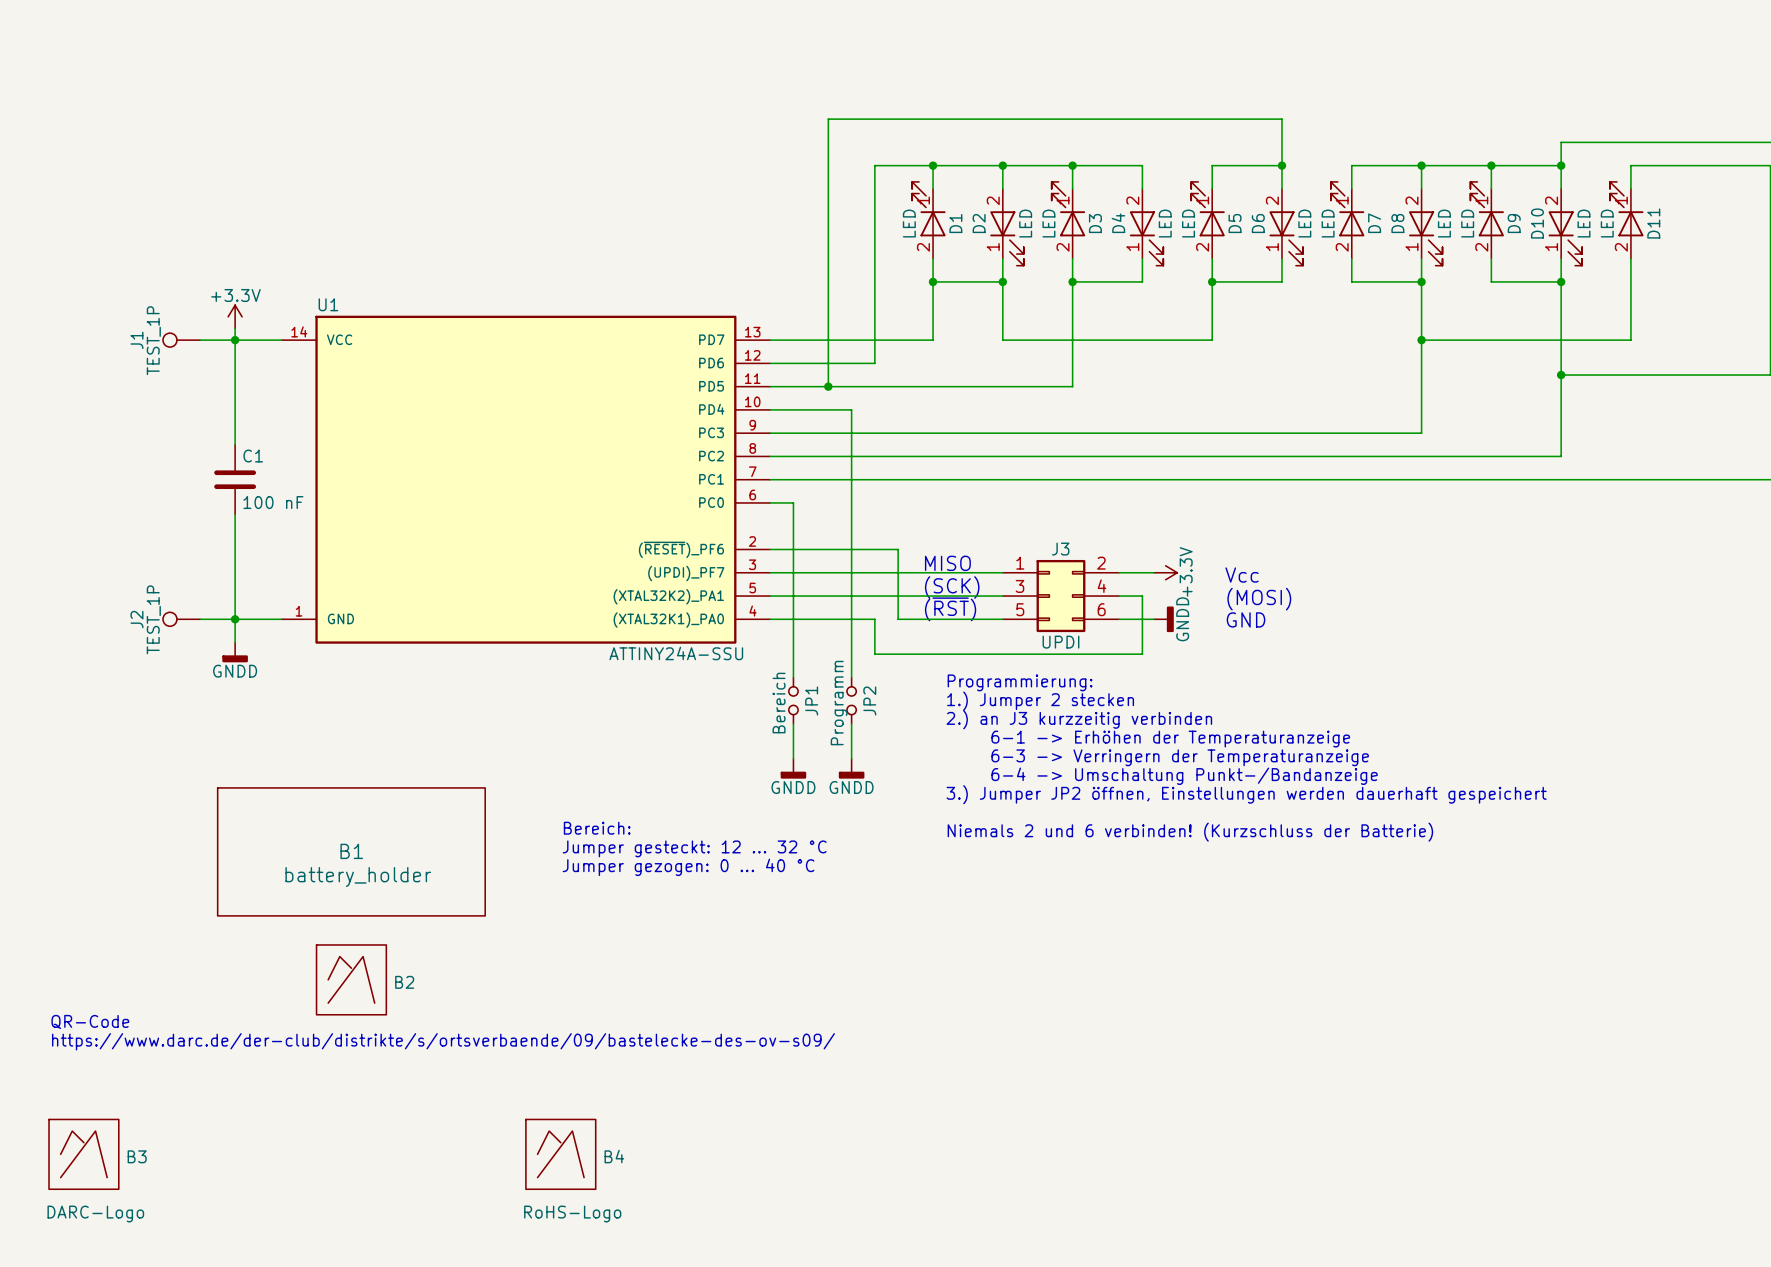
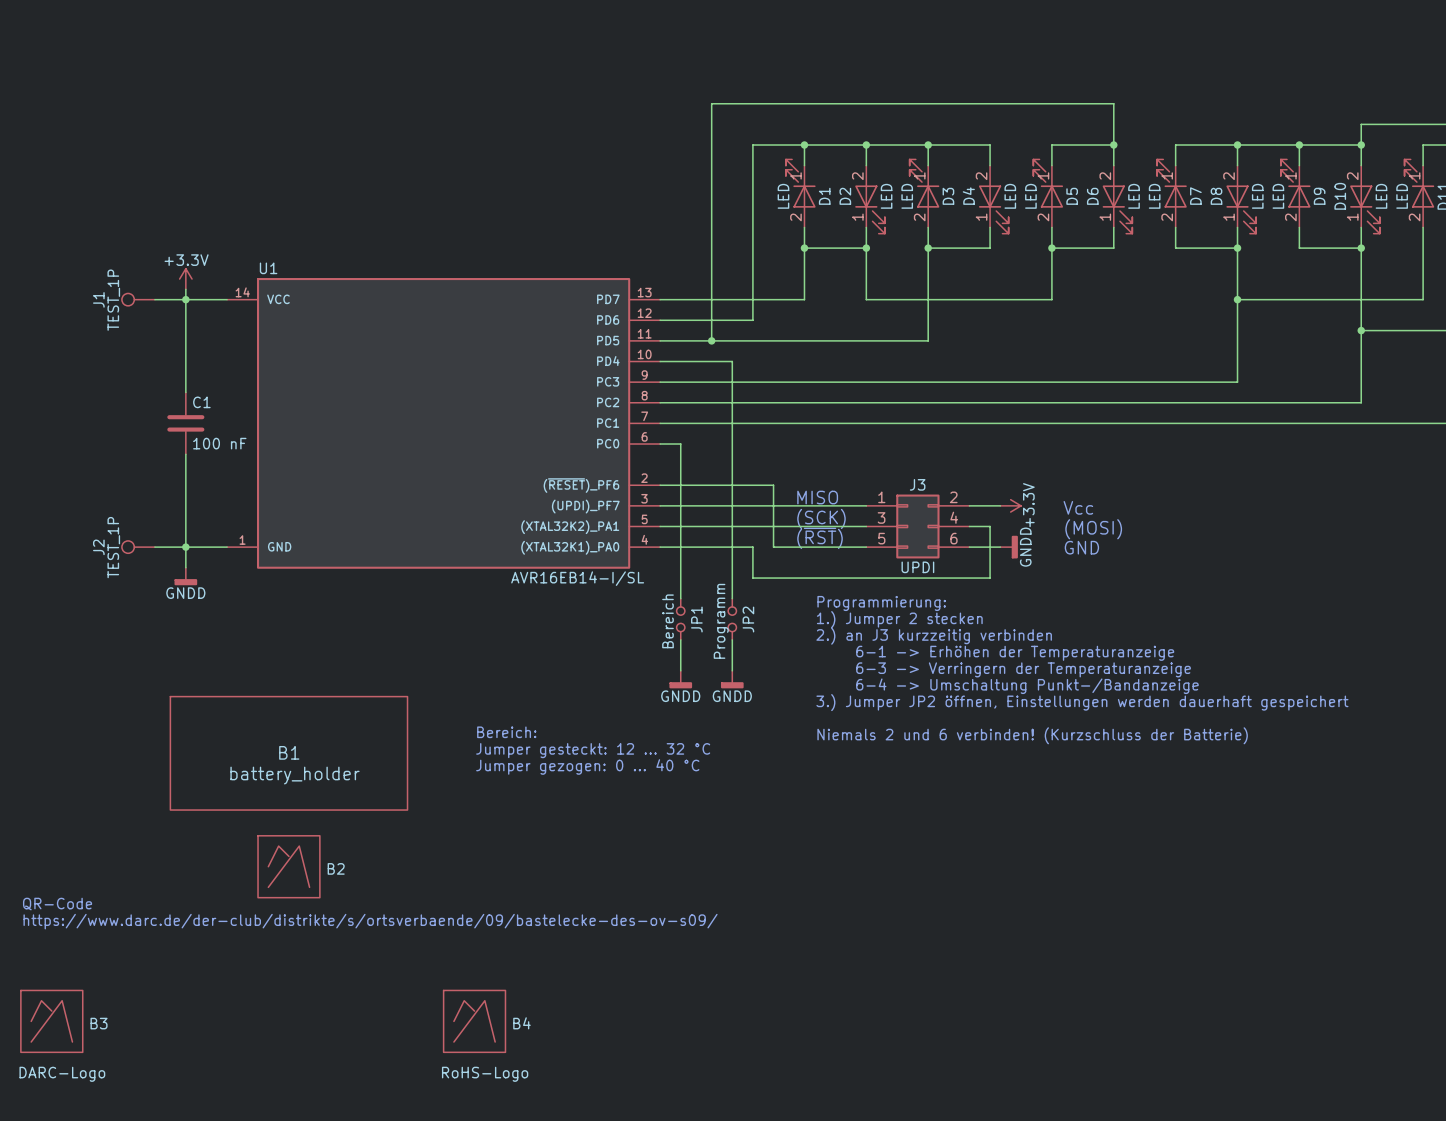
U1 value: ATTINY24A-SSU (676, 653) -> AVR16EB14-I/SL (577, 578)

